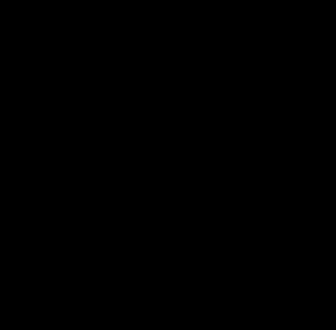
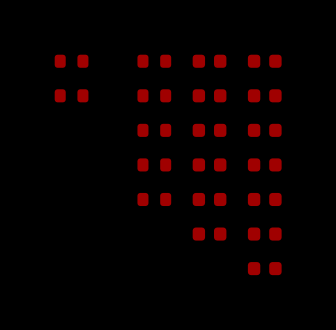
part: none -> (71, 61)
part: none -> (154, 61)
part: none -> (209, 61)
part: none -> (264, 61)
part: none -> (71, 95)
part: none -> (154, 95)
part: none -> (209, 95)
part: none -> (264, 95)
part: none -> (154, 130)
part: none -> (209, 130)
part: none -> (264, 130)
part: none -> (154, 164)
part: none -> (209, 164)
part: none -> (264, 164)
part: none -> (154, 199)
part: none -> (209, 199)
part: none -> (264, 199)
part: none -> (209, 234)
part: none -> (264, 234)
part: none -> (264, 268)

